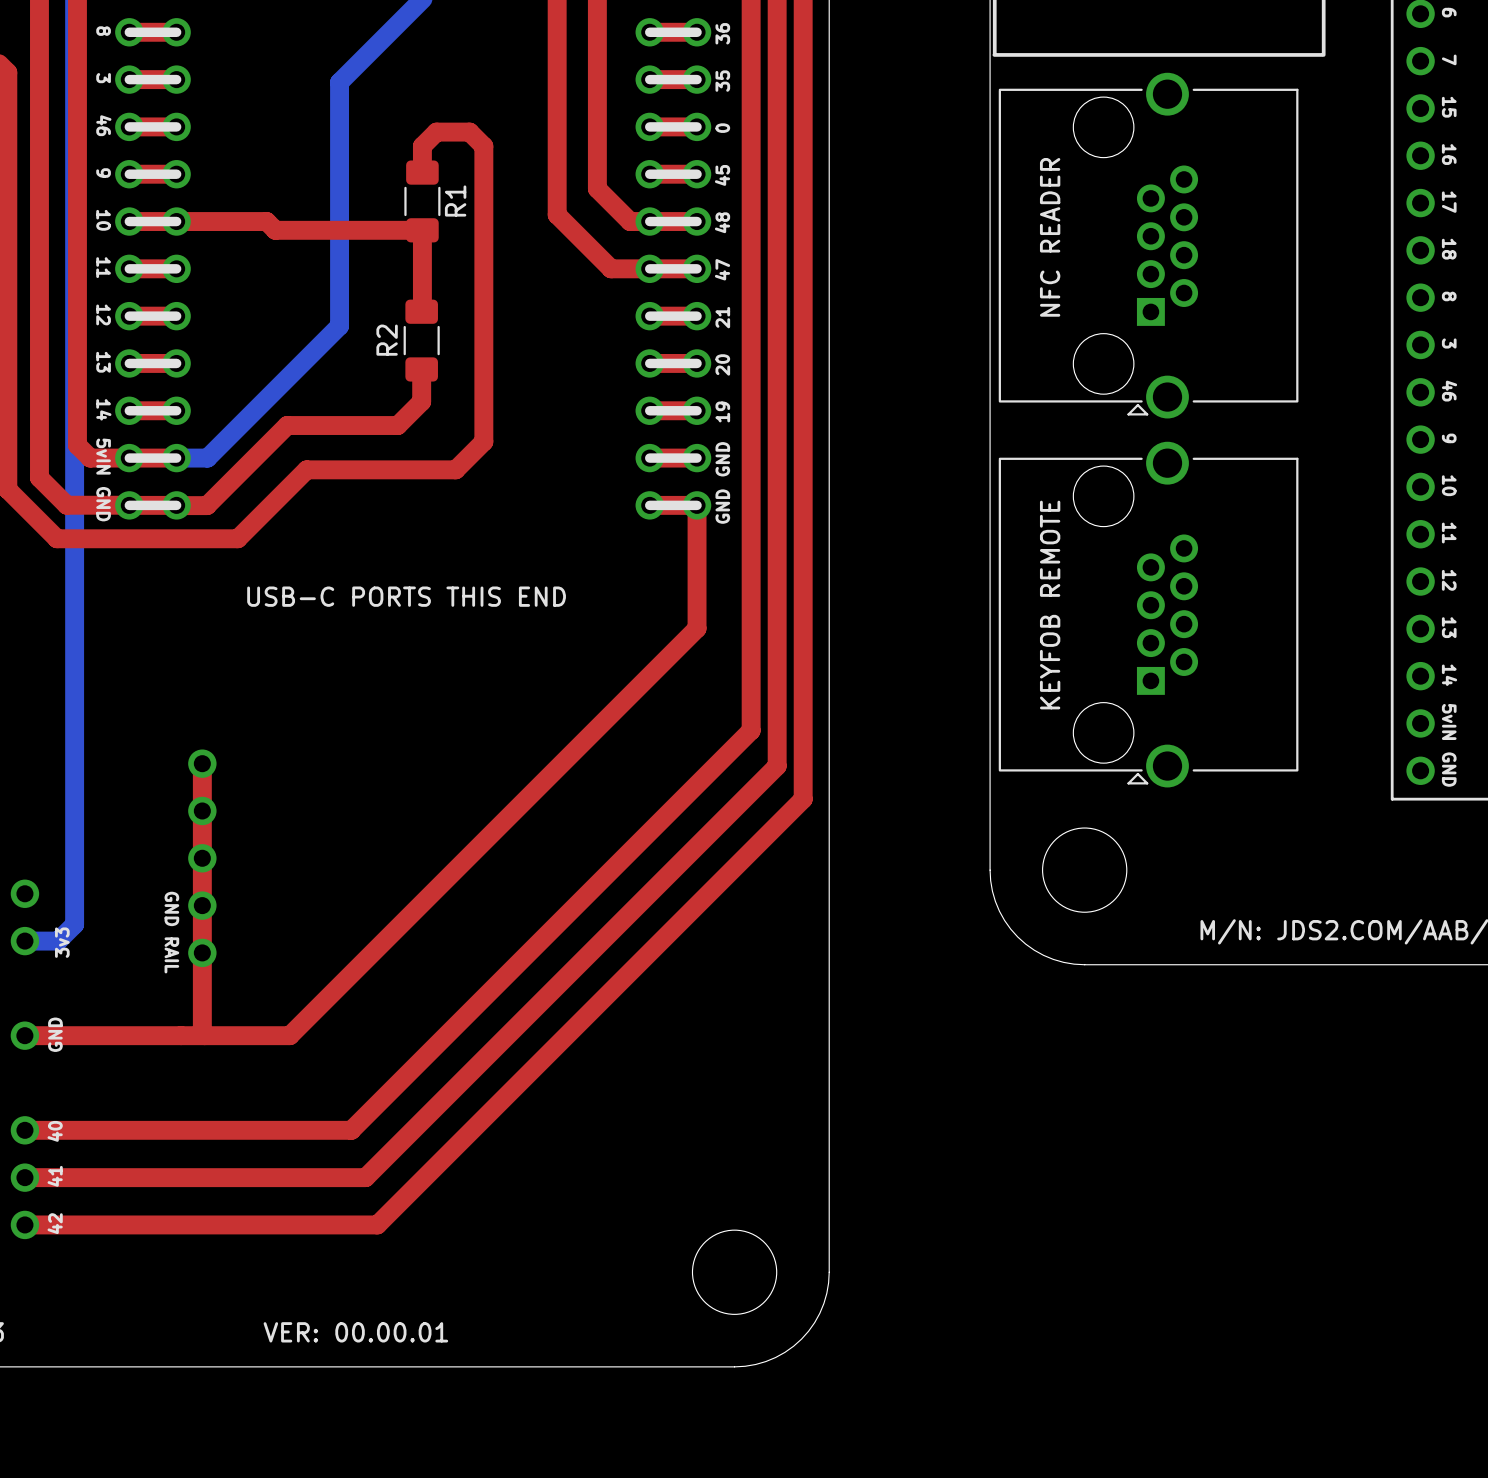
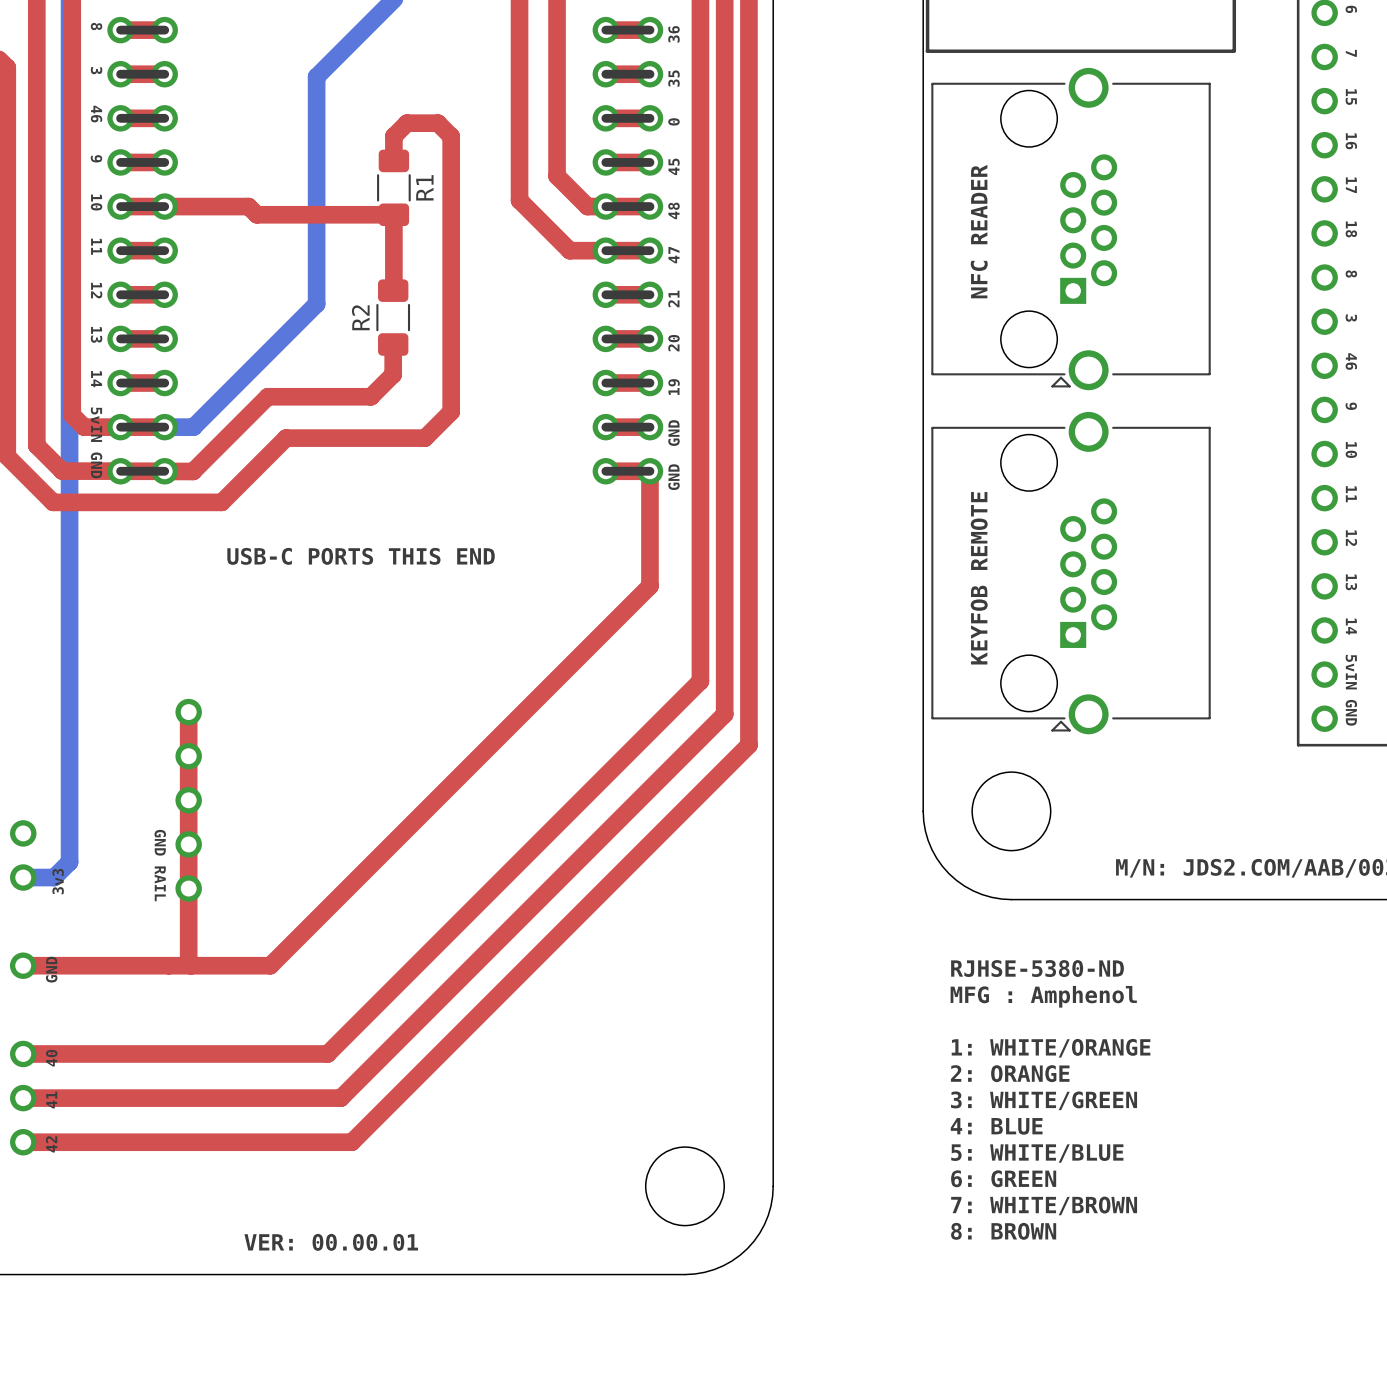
text: none -> RJHSE-5380-ND (1037, 968)
text: none -> MFG : Amphenol (1043, 996)
text: none -> 1: WHITE/ORANGE (1051, 1048)
text: none -> 2: ORANGE (1010, 1073)
text: none -> 3: WHITE/GREEN (1044, 1100)
text: none -> 4: BLUE (996, 1126)
text: none -> 5: WHITE/BLUE (1037, 1153)
text: none -> 6: GREEN (1003, 1178)
text: none -> 7: WHITE/BROWN (1044, 1205)
text: none -> 8: BROWN (1003, 1231)

